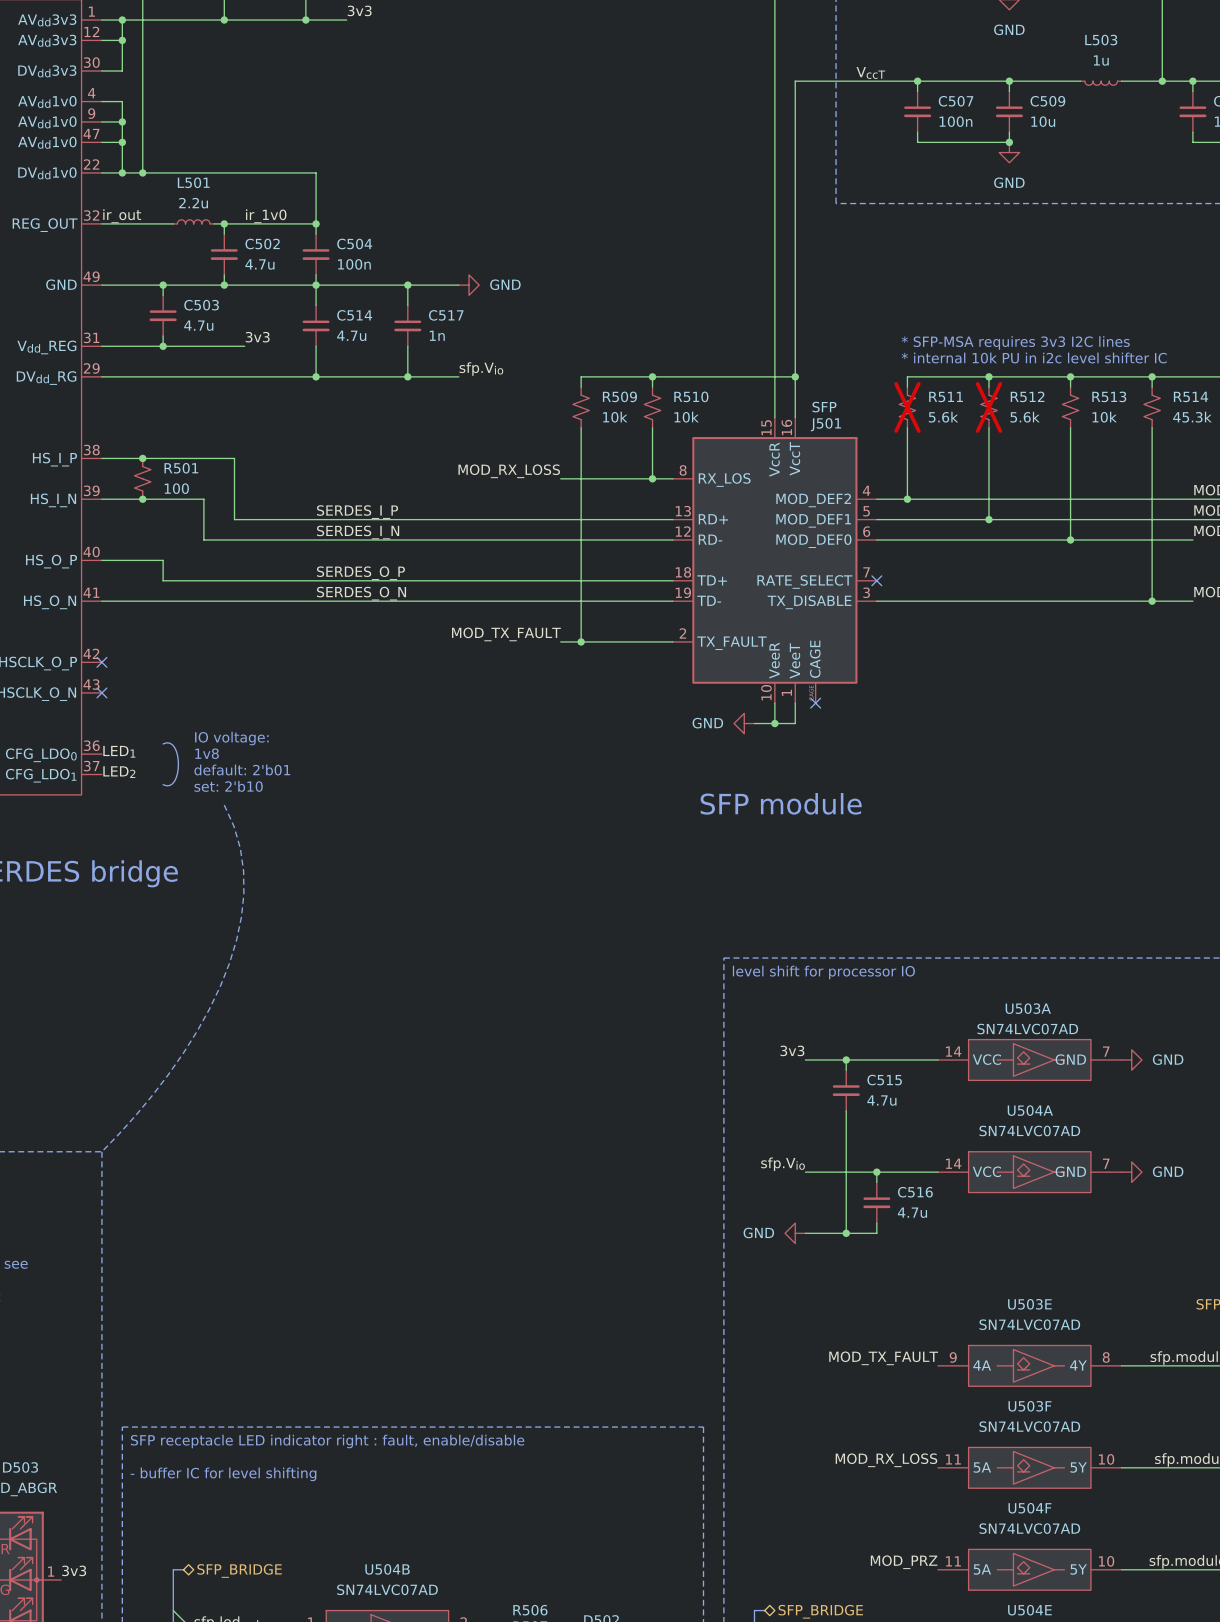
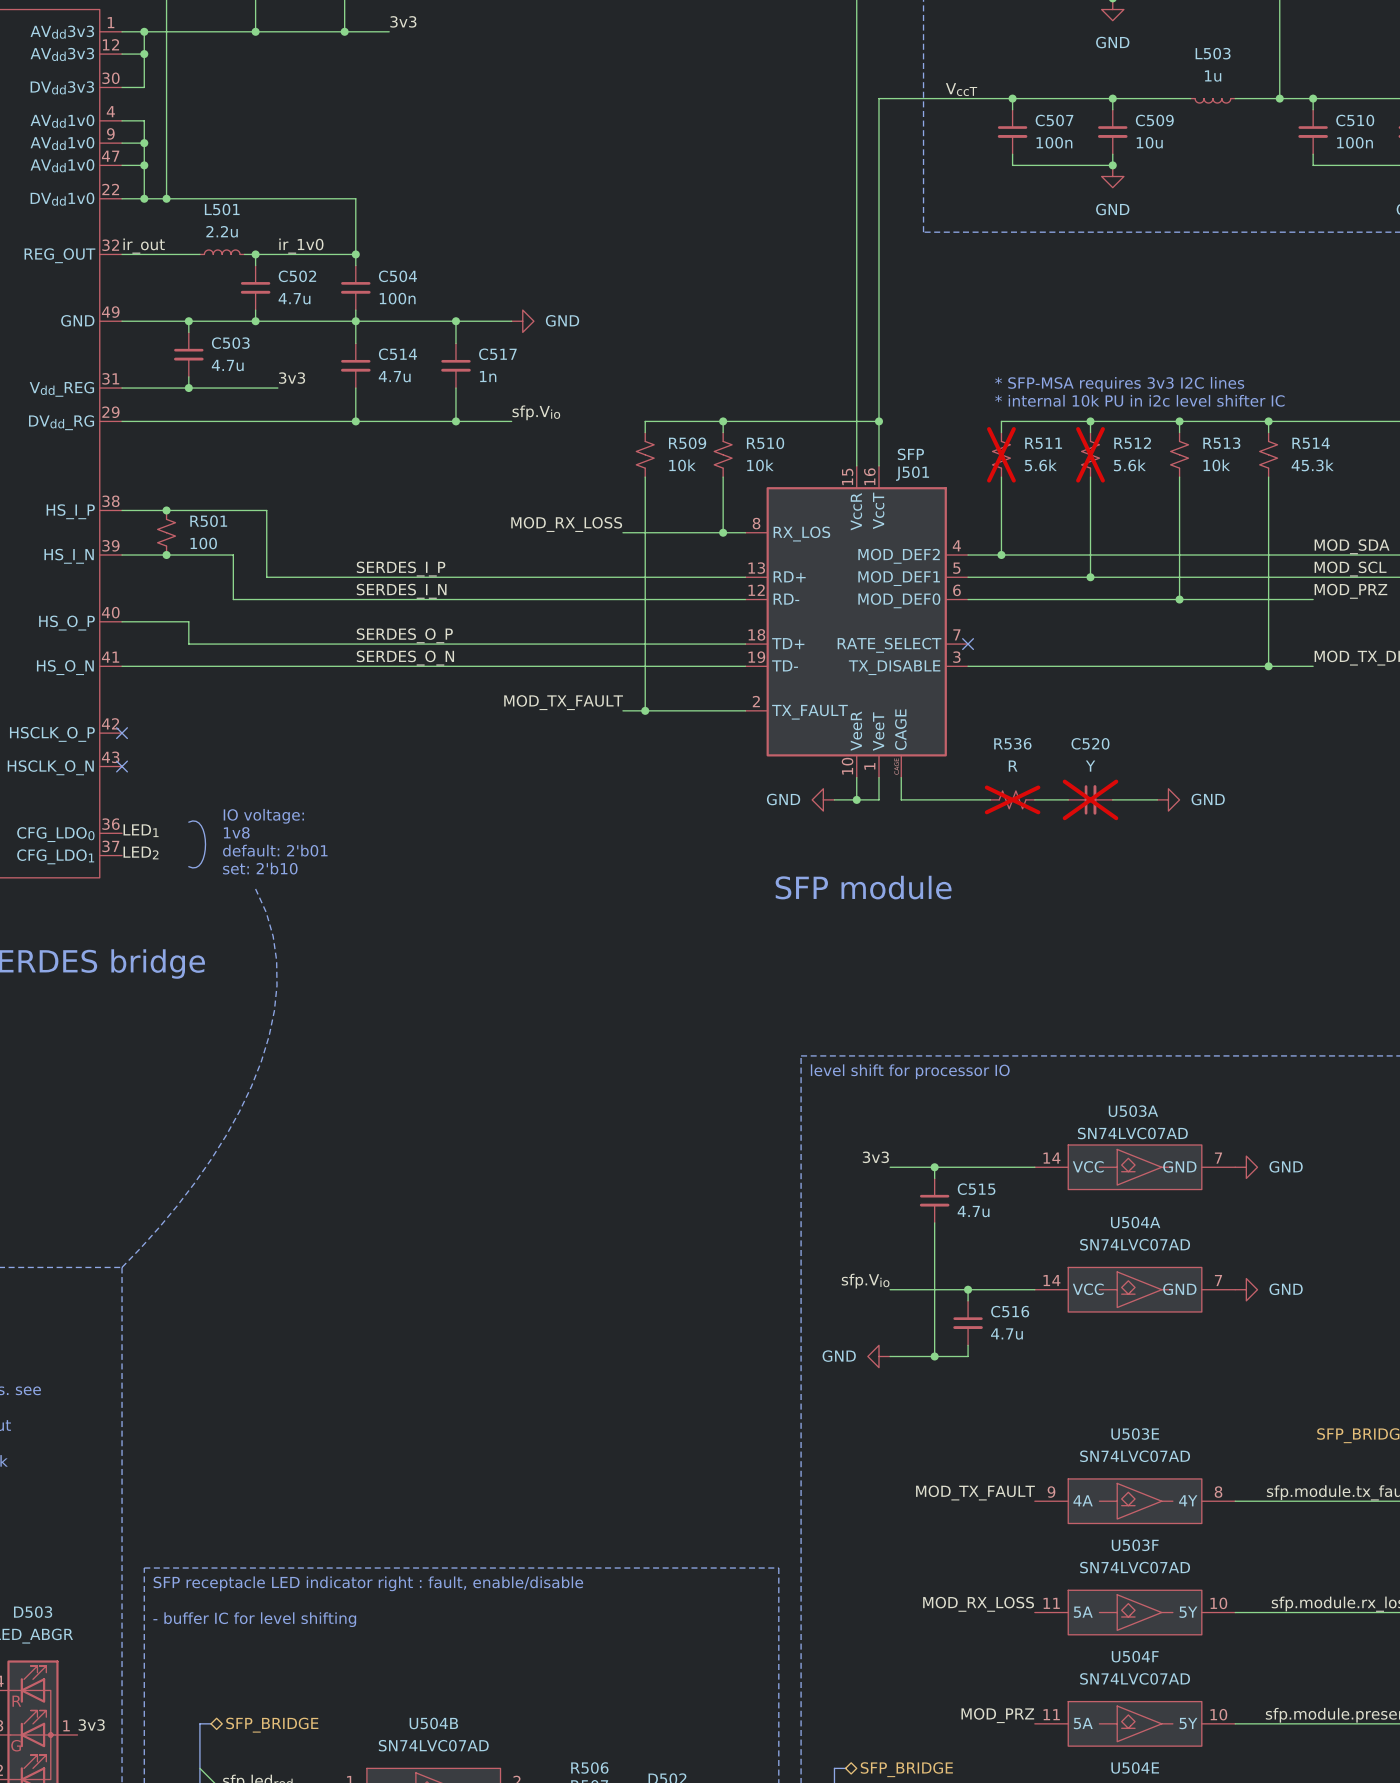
wire: none -> (901, 777) (901, 799) (990, 799)
no-connect mark: (815, 703) -> none
R536: none -> R (1012, 799)
wire: none -> (1034, 799) (1068, 799)
C520: none -> Y (1090, 799)
wire: none -> (1112, 799) (1157, 799)
power symbol: none -> GND (1168, 799)

